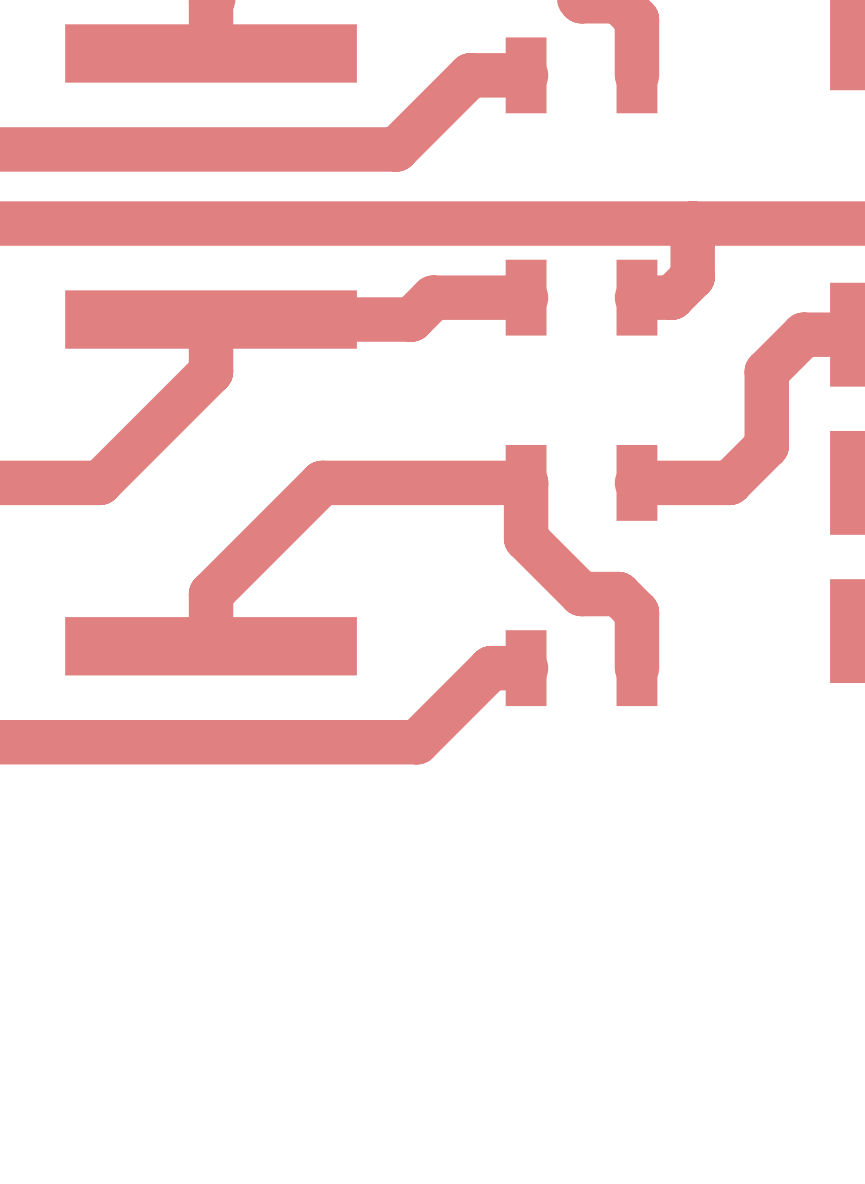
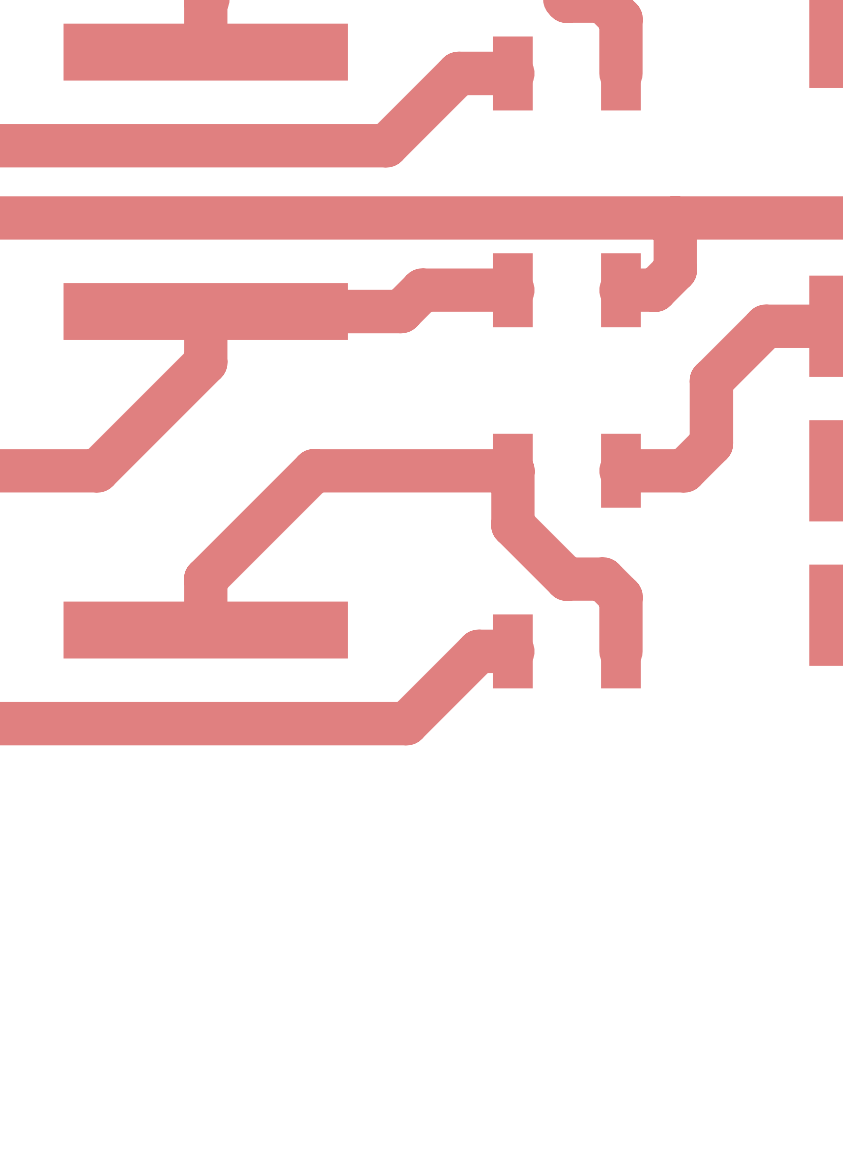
top track: (803, 334) (766, 371) (766, 445) (729, 482) (701, 482) -> (783, 326) (765, 326) (711, 380) (711, 443) (684, 470)

